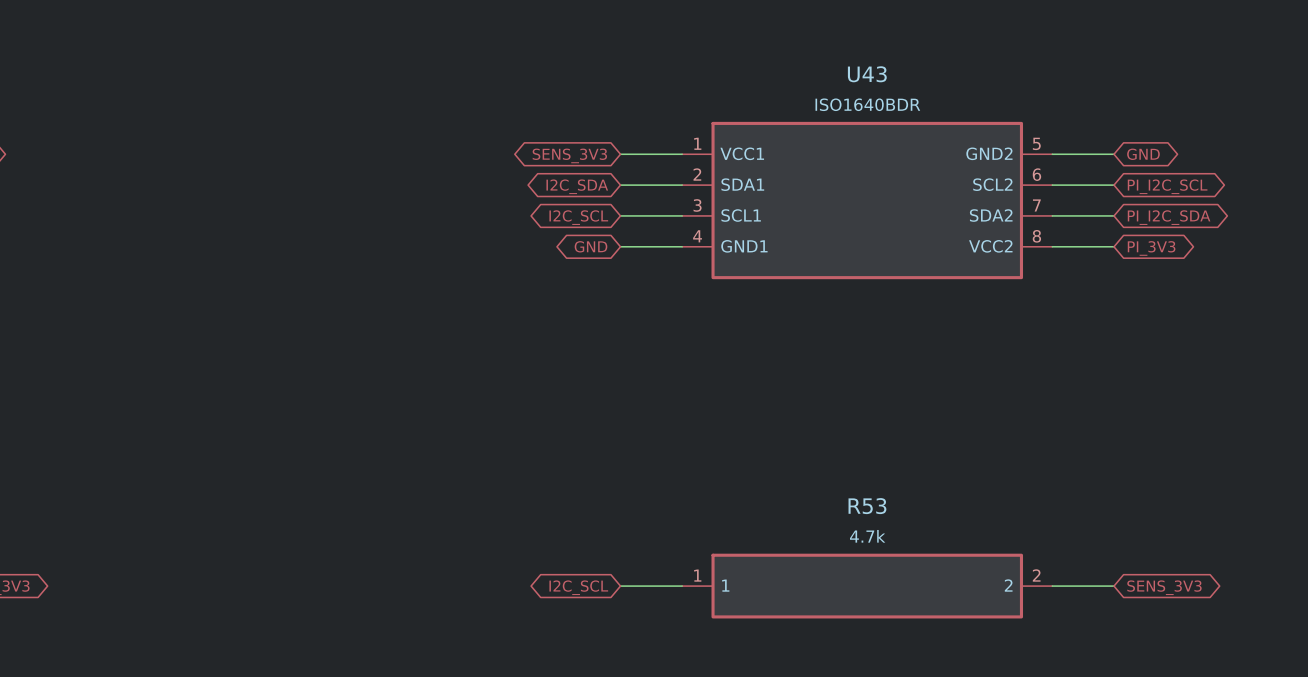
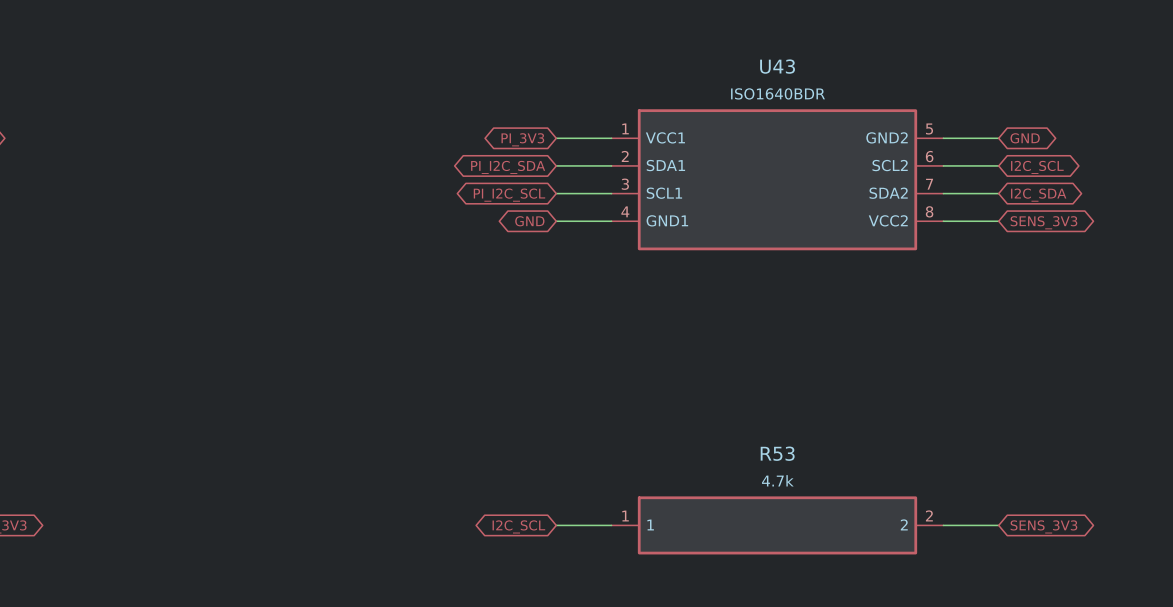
global label: SENS_3V3 (569, 155) -> PI_3V3 (522, 139)
global label: I2C_SDA (577, 186) -> PI_I2C_SDA (508, 167)
global label: PI_I2C_SCL (1167, 186) -> I2C_SCL (1037, 167)
global label: I2C_SCL (578, 217) -> PI_I2C_SCL (509, 195)
global label: PI_I2C_SDA (1169, 217) -> I2C_SDA (1038, 195)
global label: PI_3V3 (1151, 248) -> SENS_3V3 (1043, 222)

